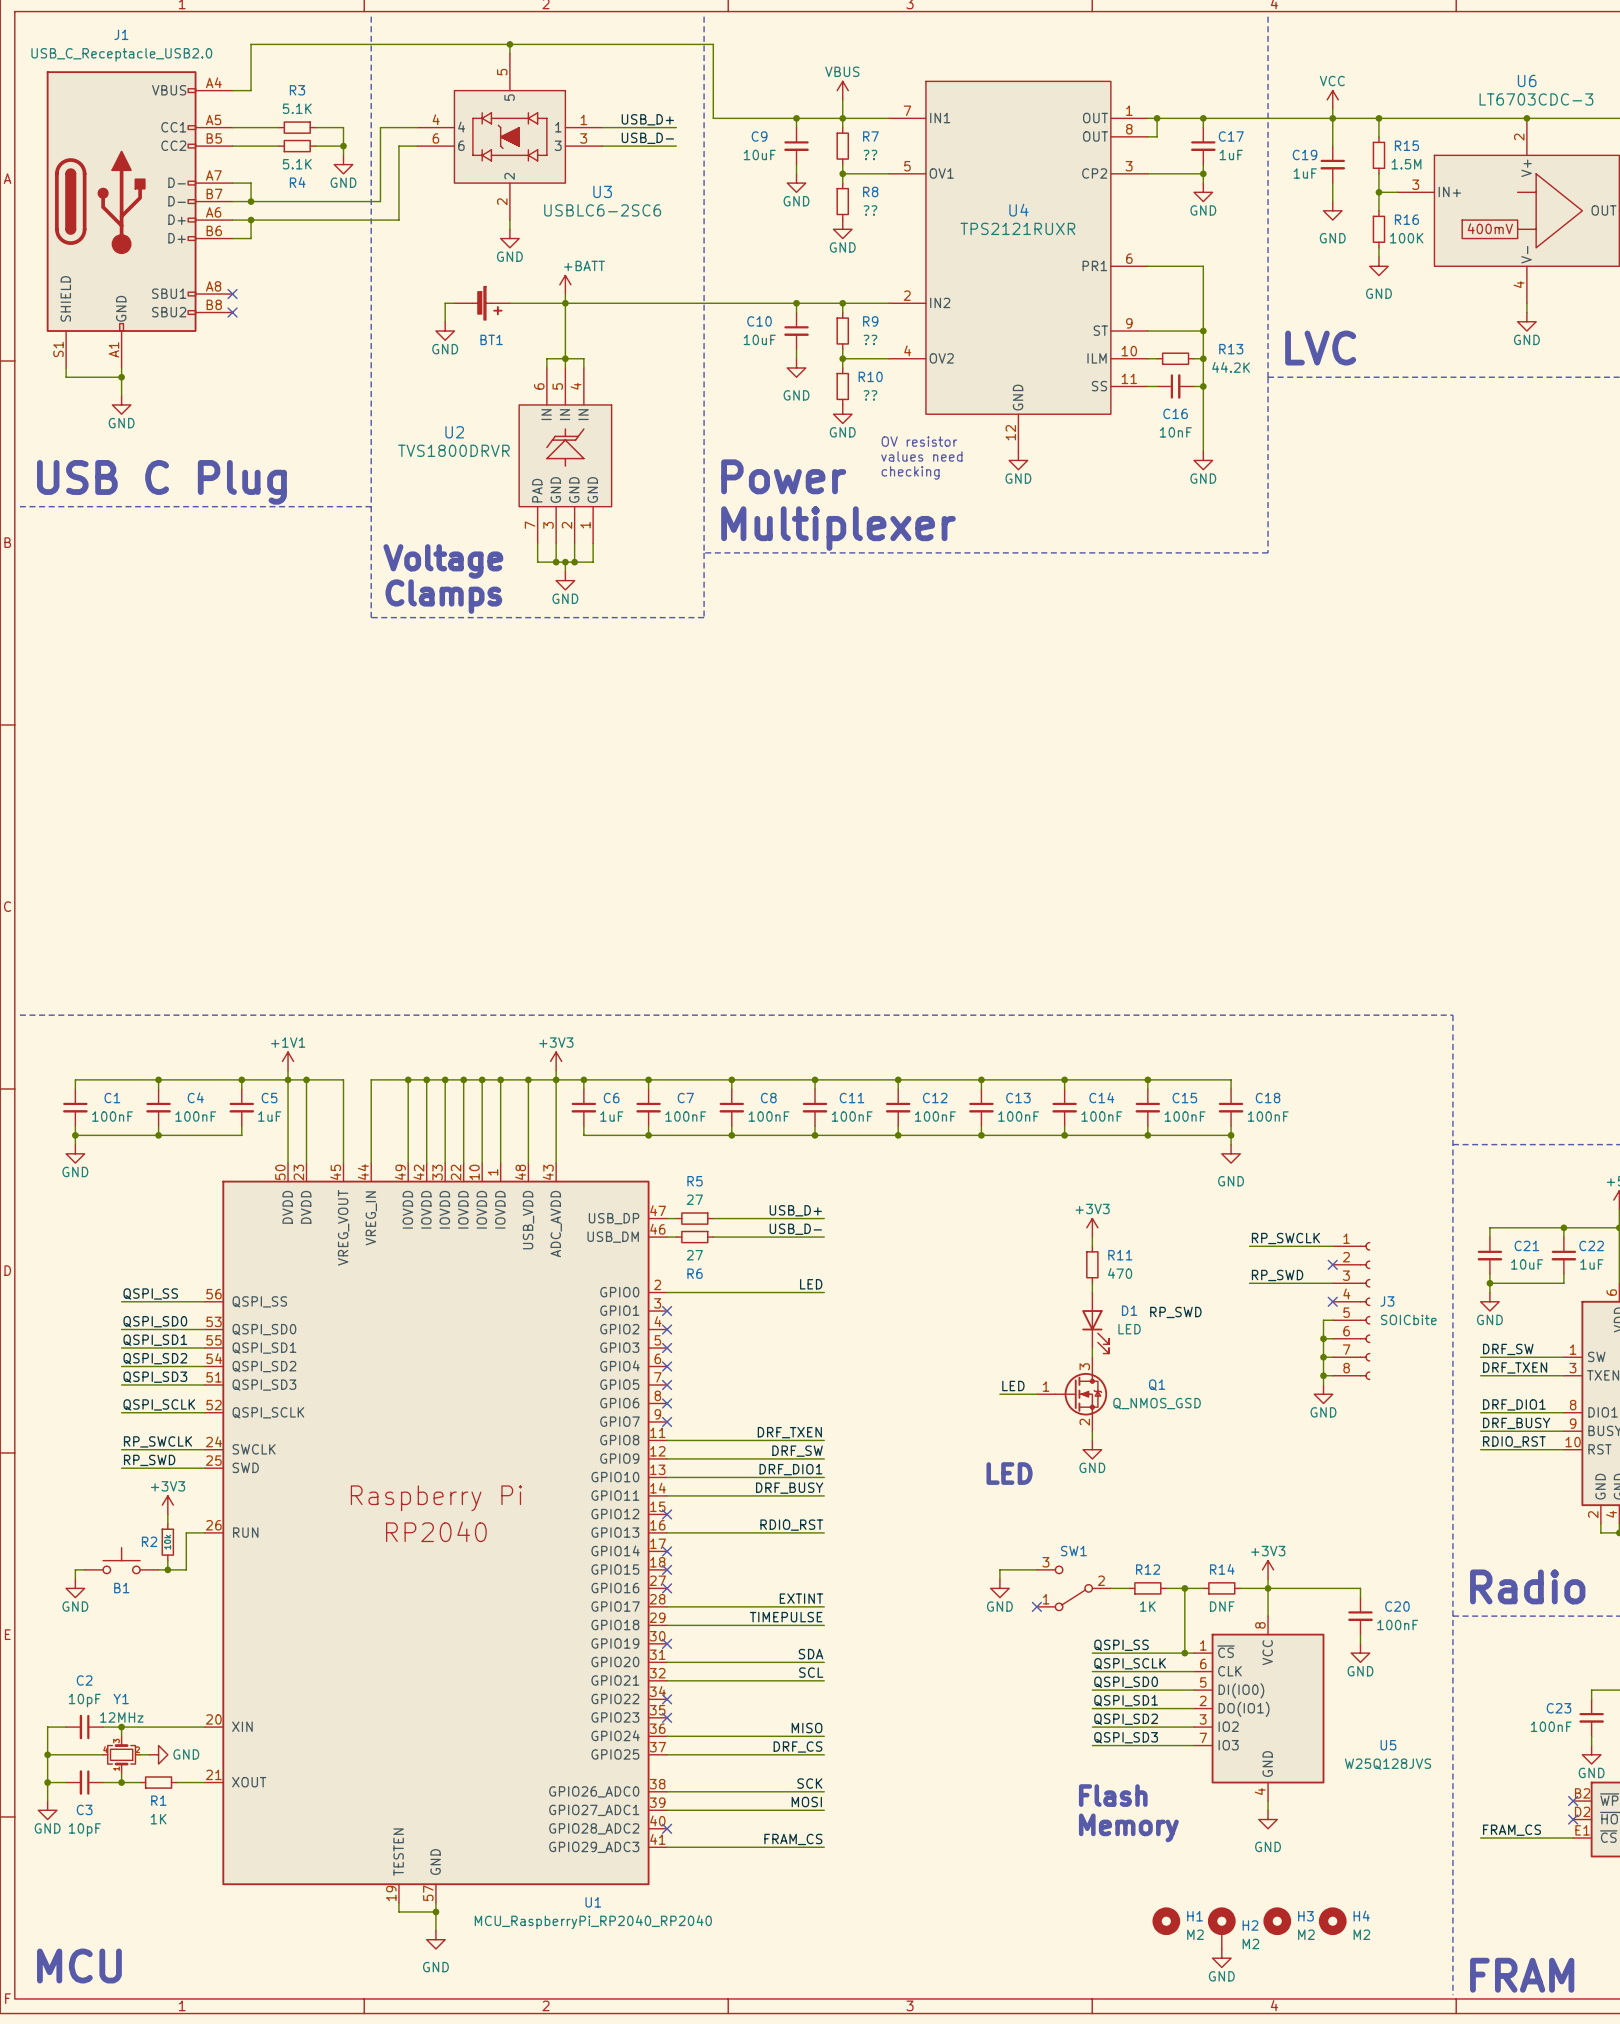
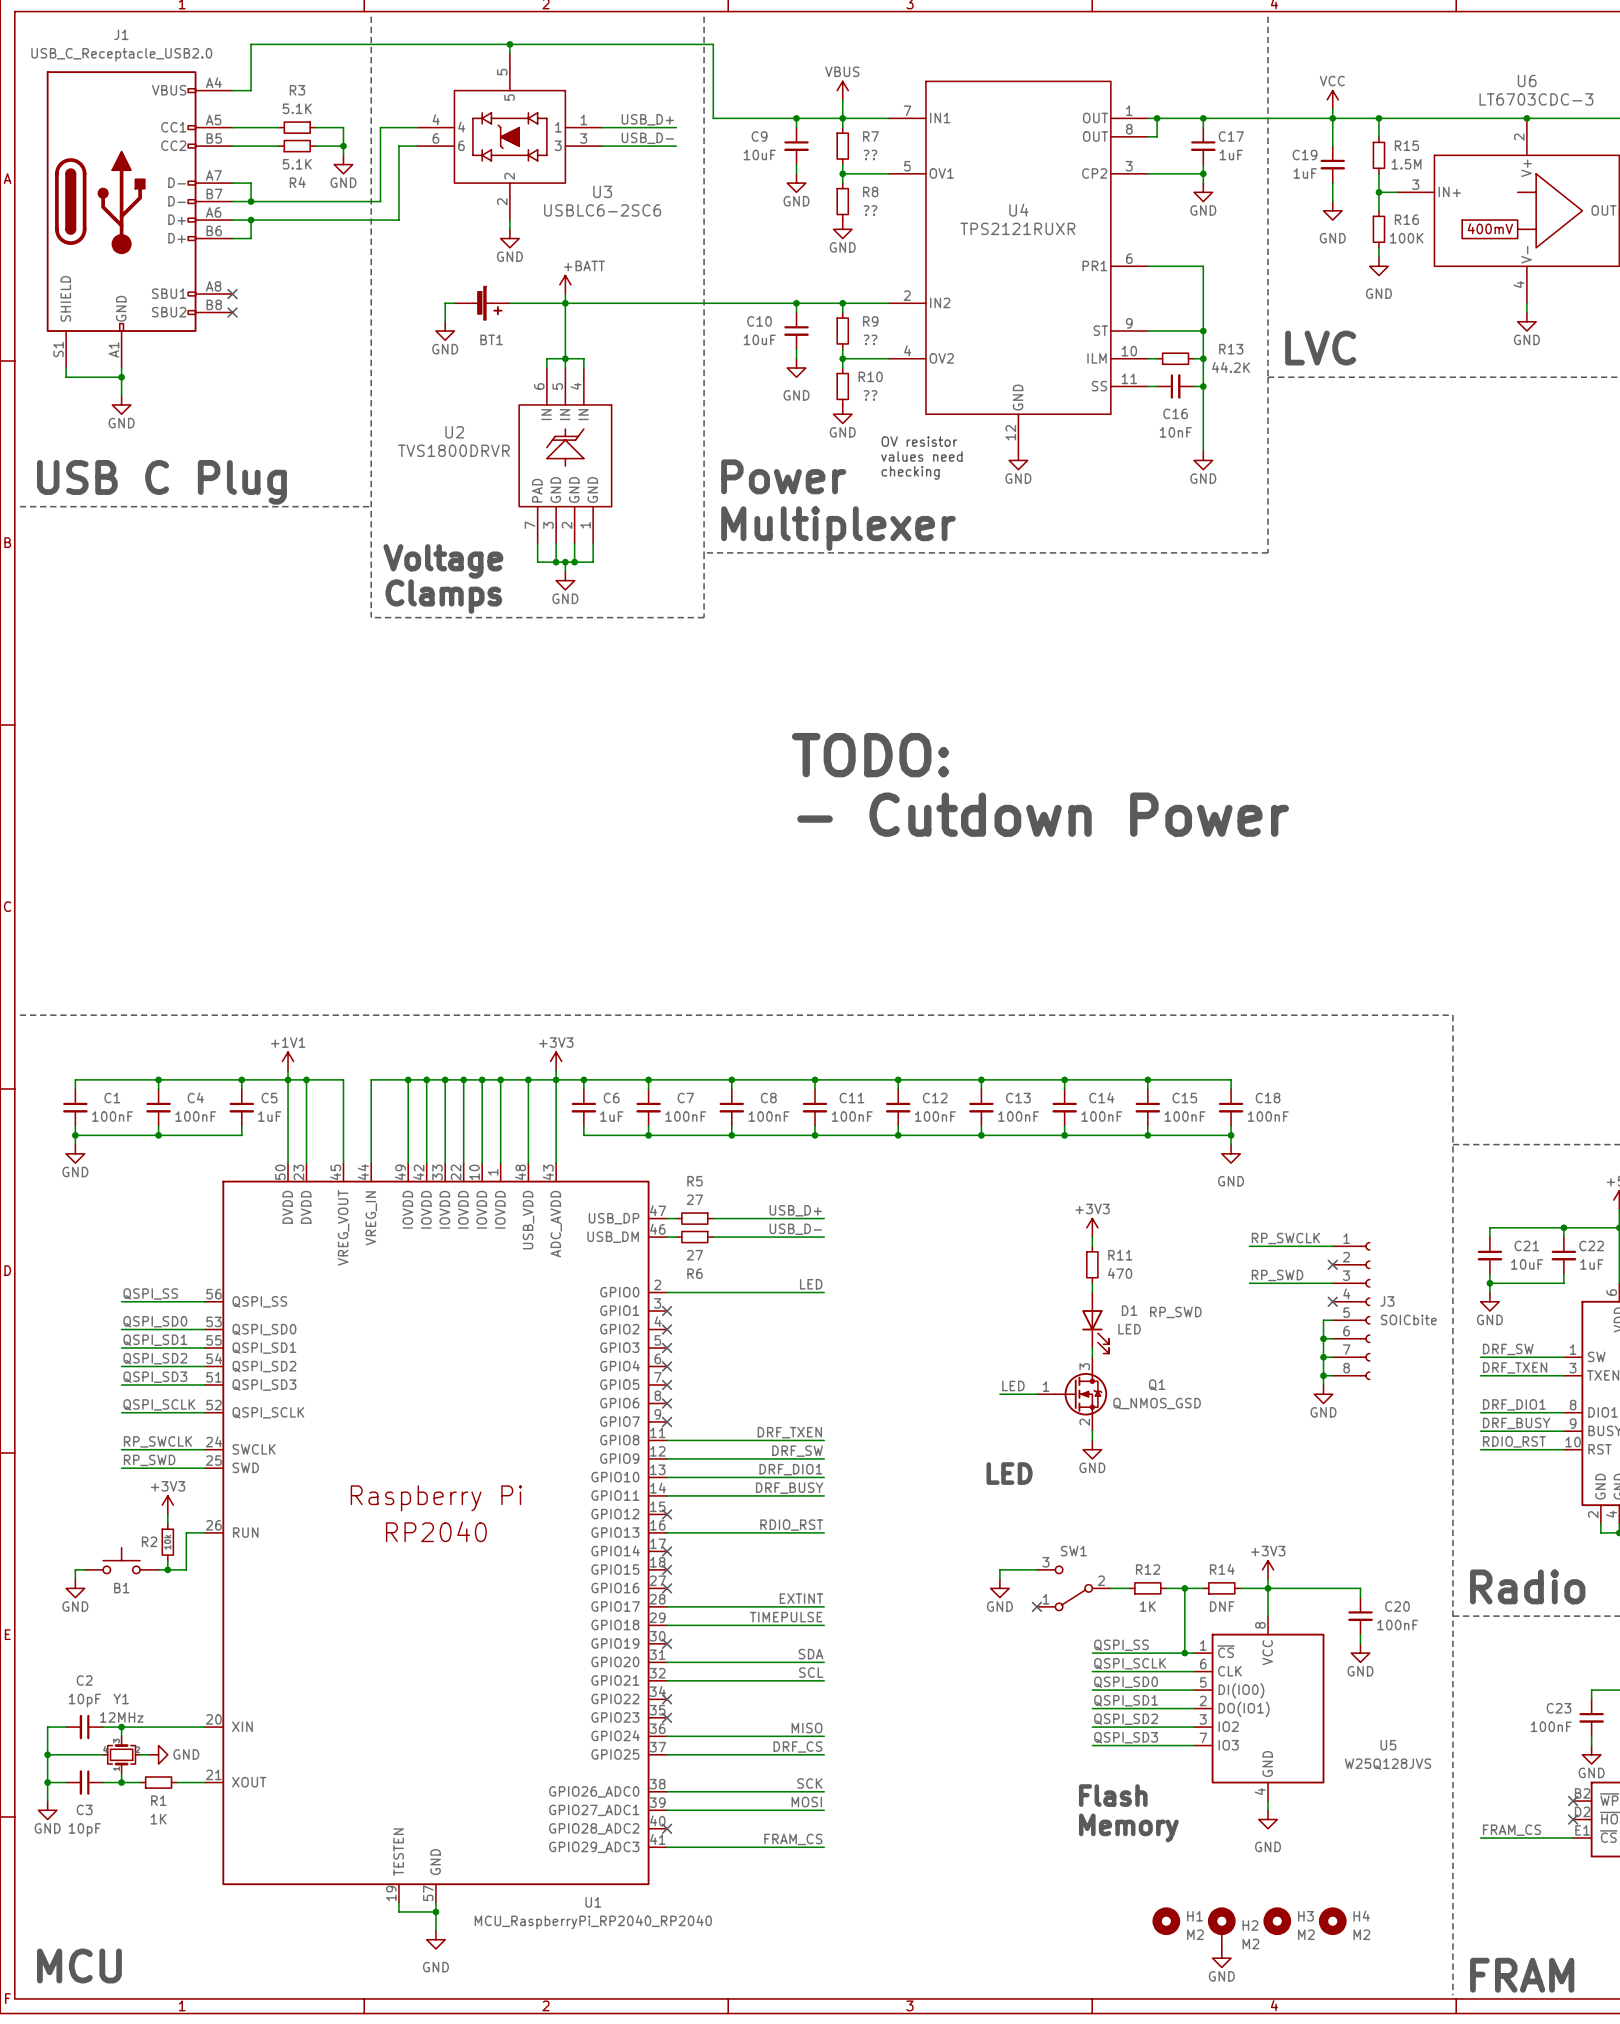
text: none -> TODO: (870, 755)
text: none -> - Cutdown Power (1043, 814)

